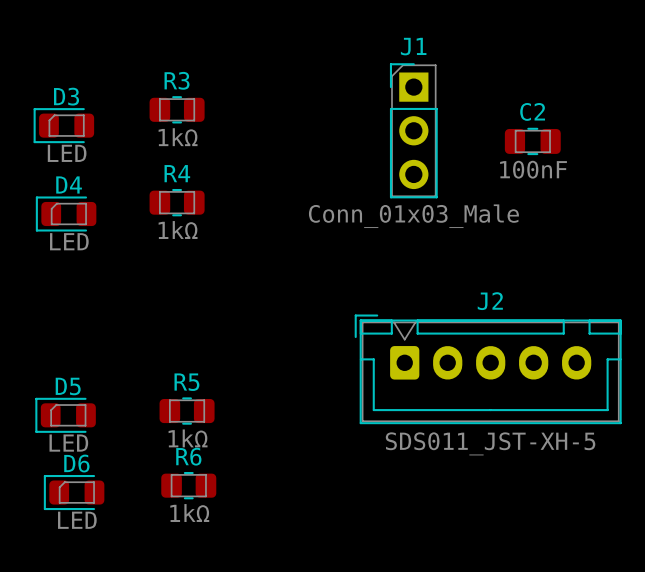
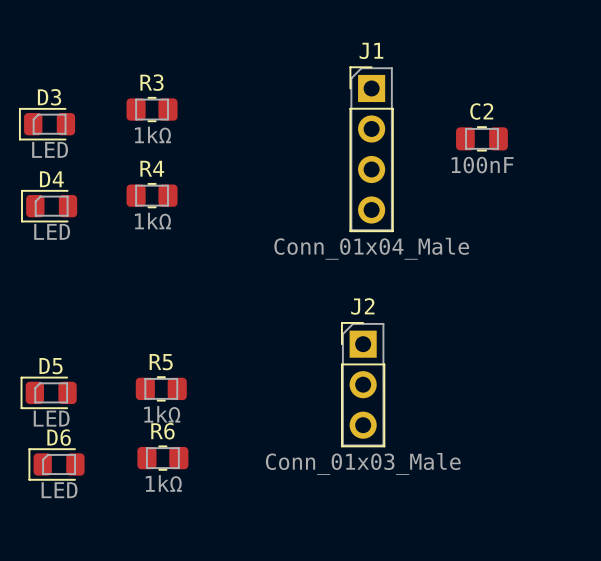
J1 footprint: [389, 63, 438, 199] -> [349, 66, 394, 233]
J1 value: Conn_01x03_Male (413, 216) -> Conn_01x04_Male (371, 248)
J2 footprint: [354, 314, 622, 425] -> [340, 322, 386, 448]
J2 value: SDS011_JST-XH-5 (490, 443) -> Conn_01x03_Male (363, 463)

